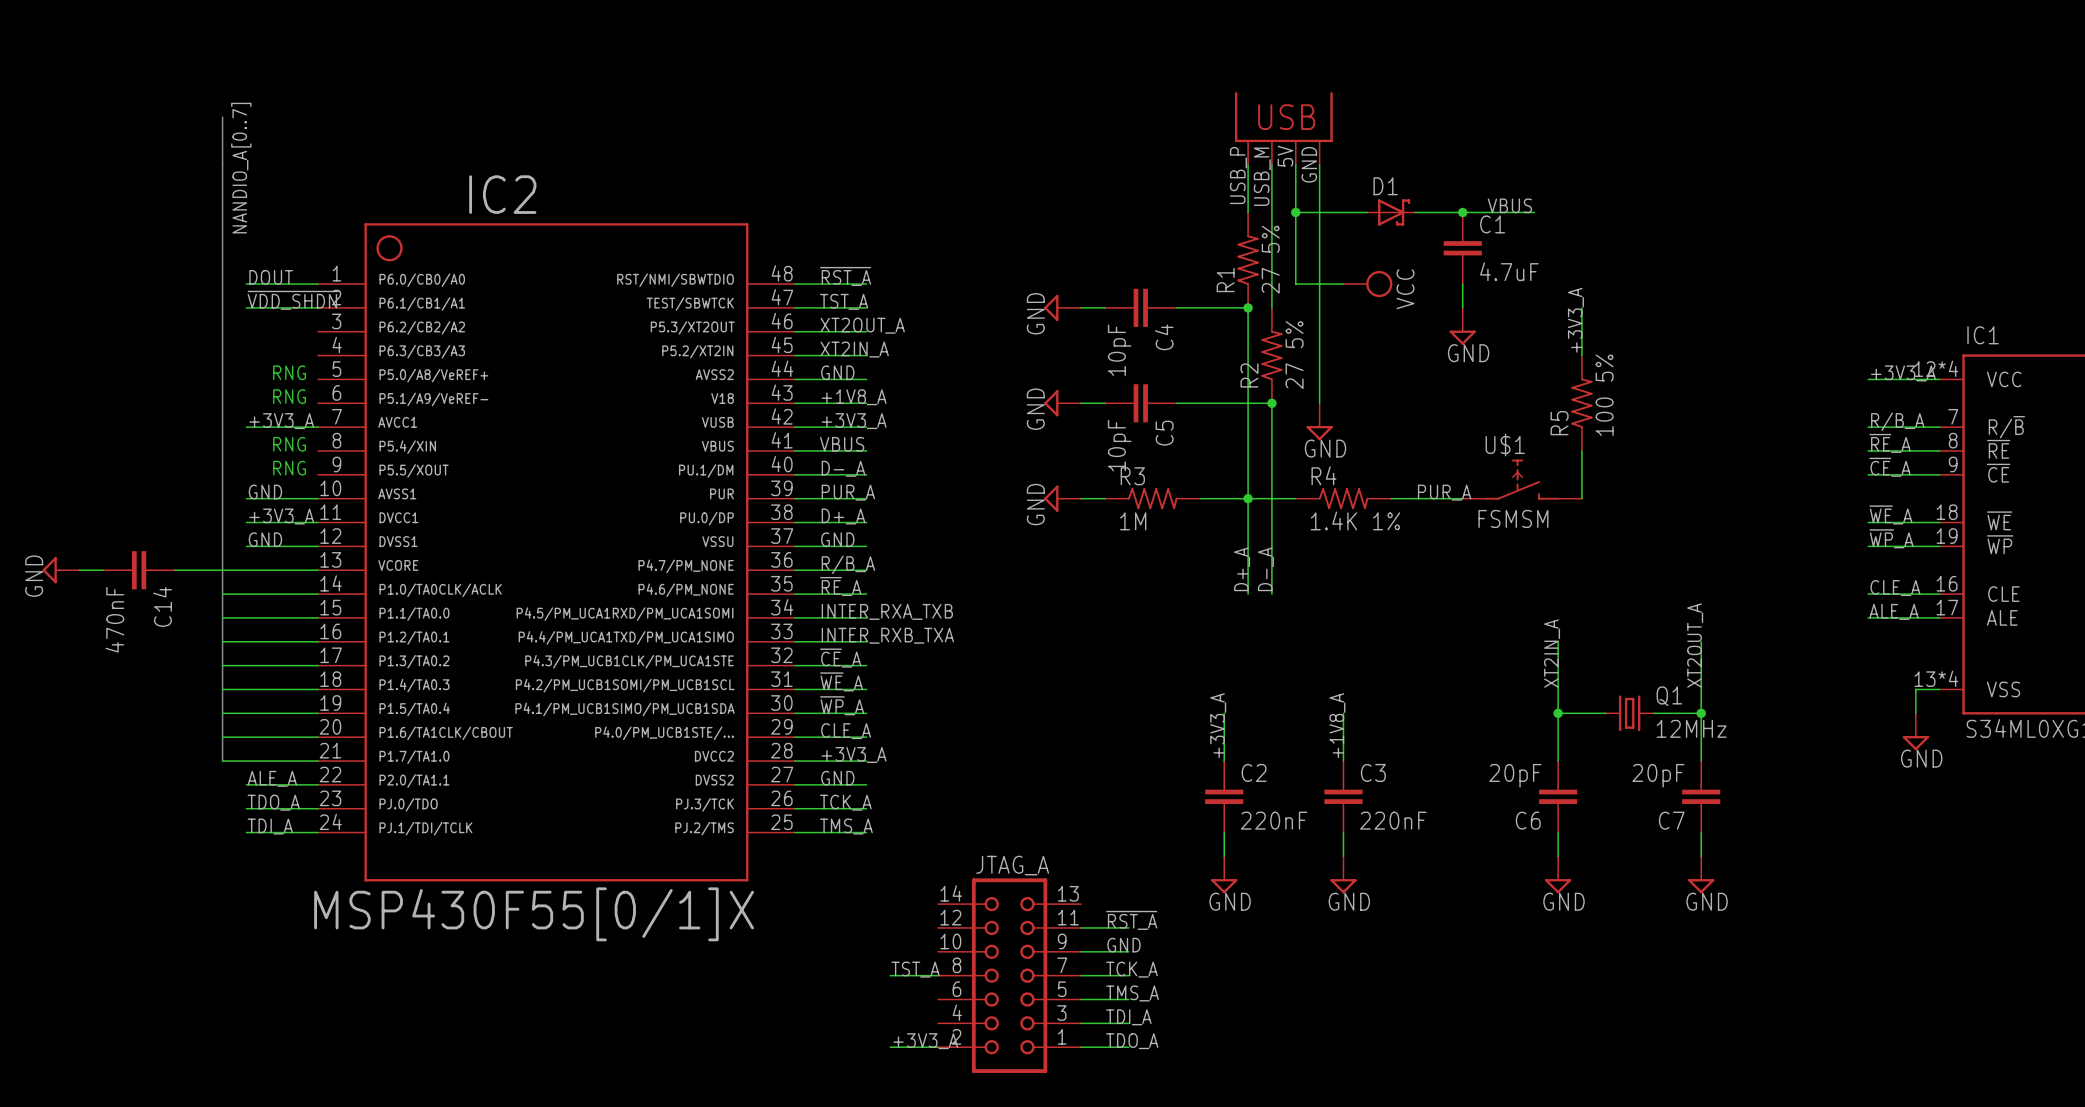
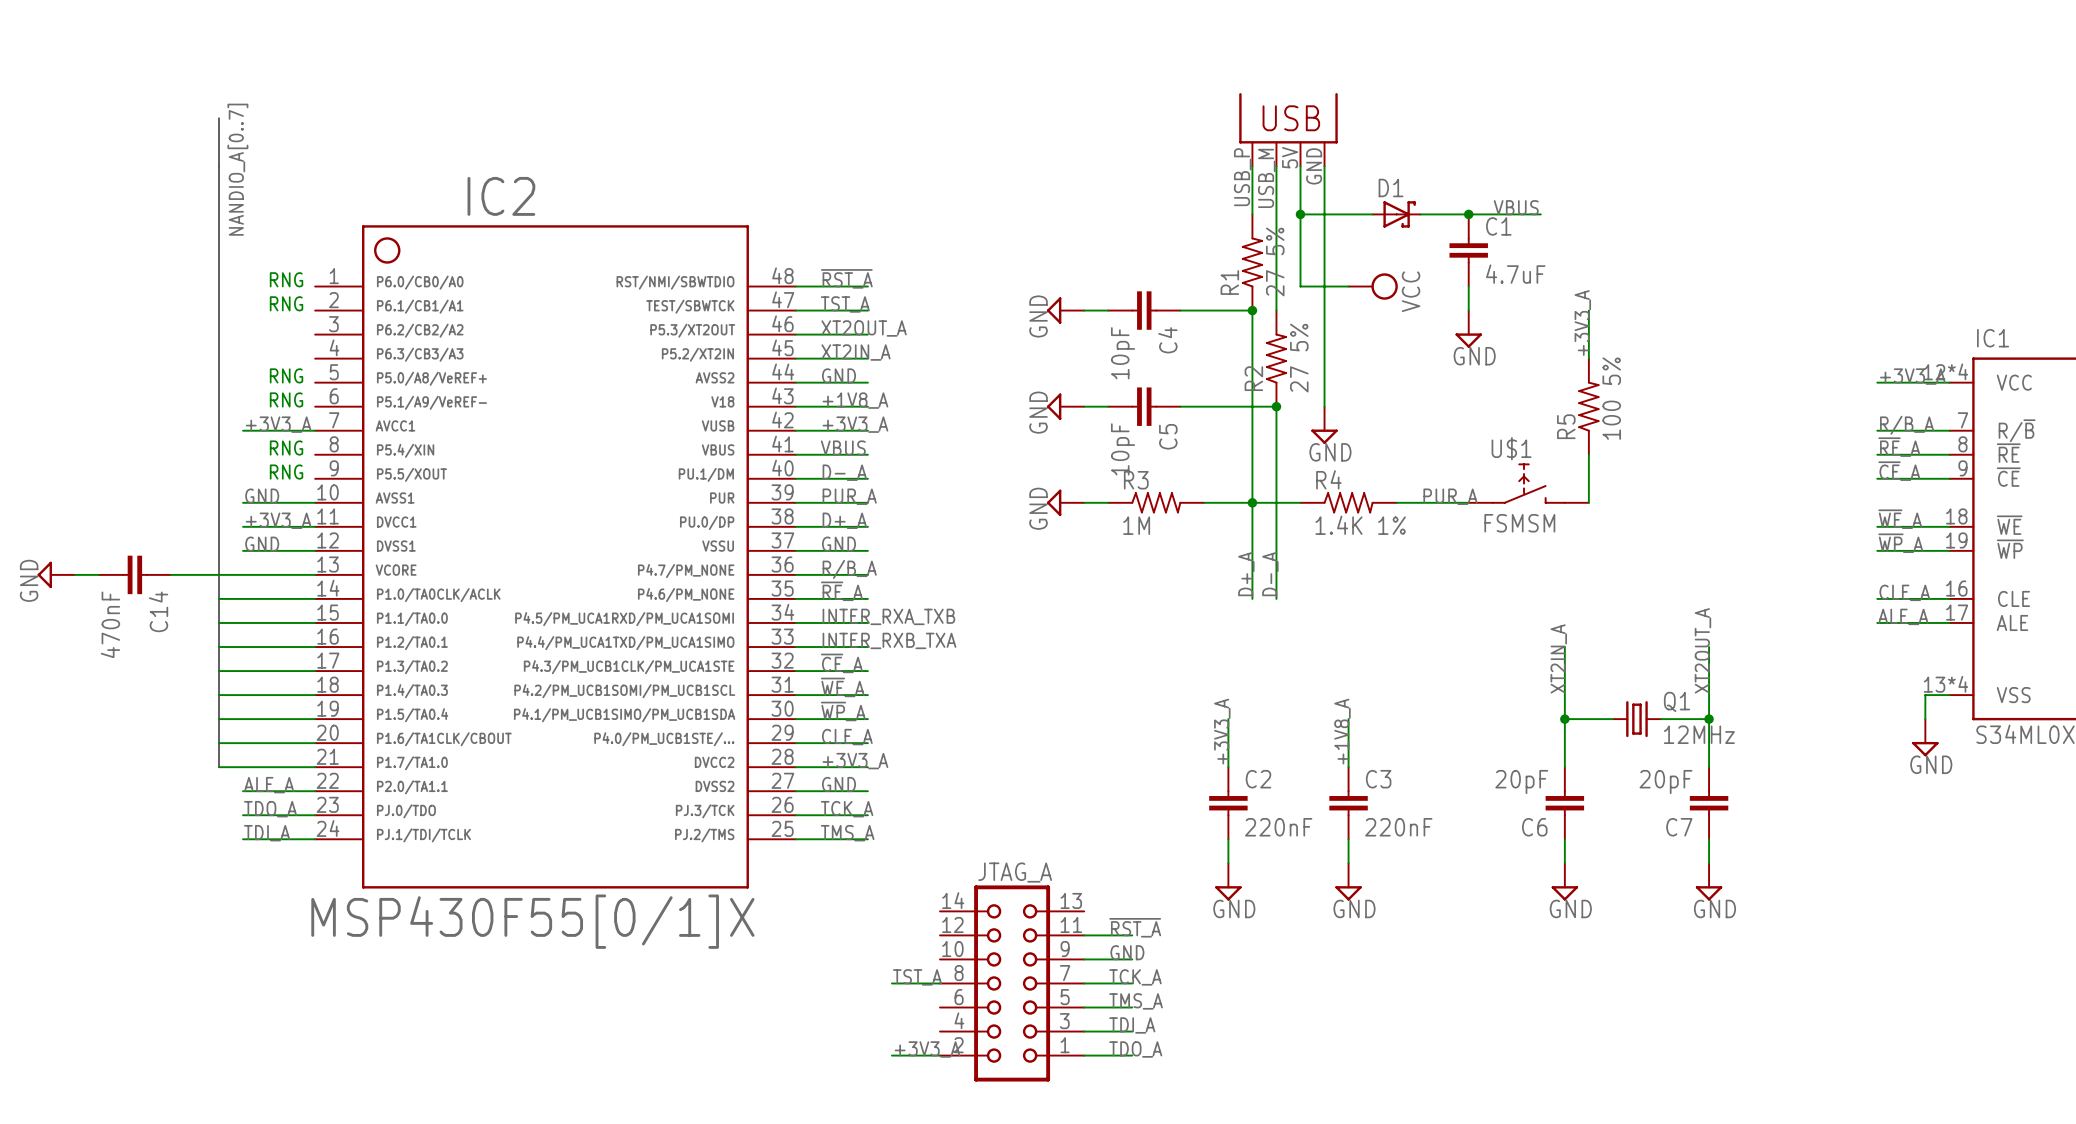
label: DOUT (271, 277) -> none
text: none -> RNG (286, 279)
wire: (246, 284) (317, 284) -> none
label: ~{VDD_SHDN} (293, 300) -> none
text: none -> RNG (286, 303)
wire: (246, 307) (317, 307) -> none

